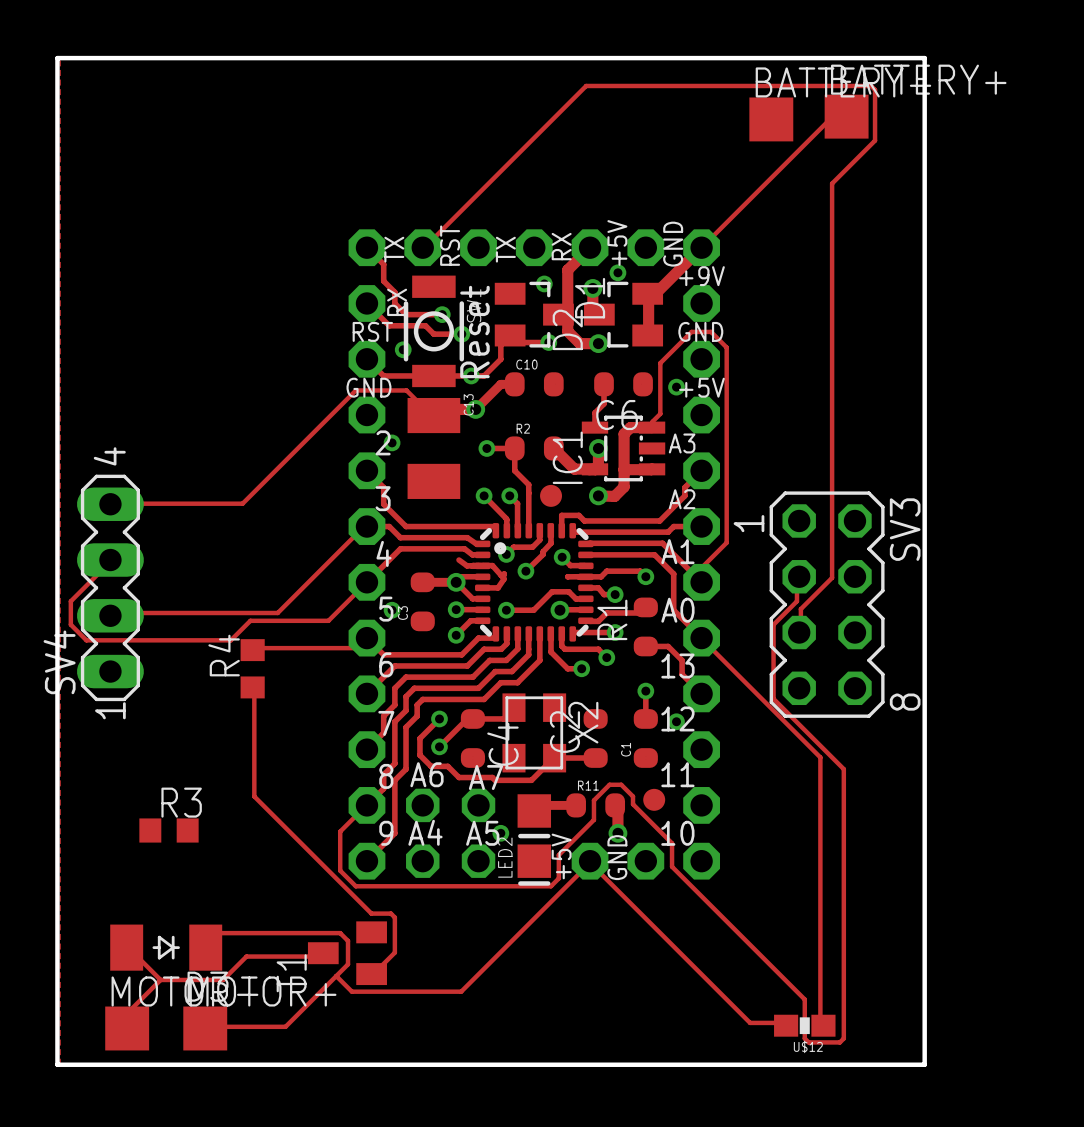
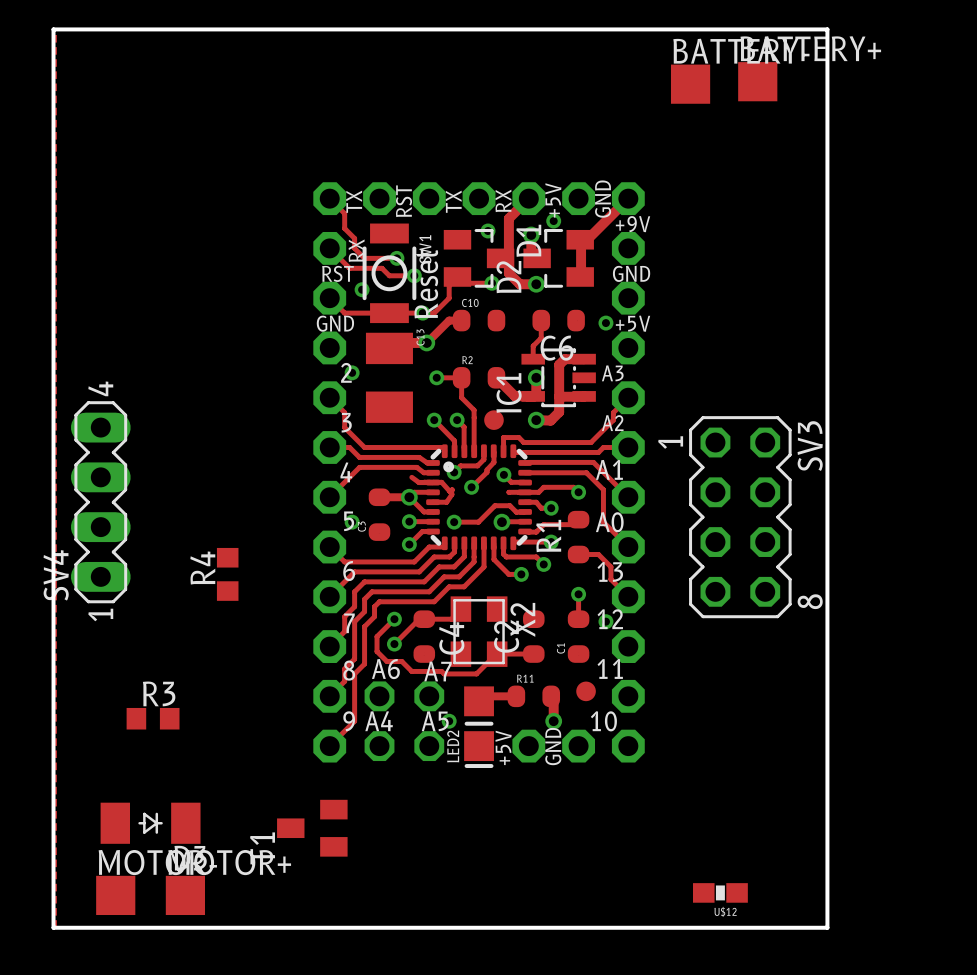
track: (846, 116) (832, 117) (701, 247) -> none
track: (422, 247) (586, 85) (871, 85) (875, 89) (875, 140) (832, 183) (832, 577) (800, 609) (800, 632) (799, 632) -> none
track: (433, 415) (406, 390) (355, 390) (242, 503) (110, 504) -> none
track: (652, 427) (652, 421) (660, 413) (660, 363) (691, 331) (711, 331) (726, 347) (726, 542) (695, 573) (701, 582) -> none
track: (366, 526) (363, 527) (277, 613) (113, 613) (110, 615) -> none
track: (110, 560) (70, 601) (70, 624) (86, 640) (230, 640) (250, 620) (328, 620) (366, 582) -> none
track: (799, 576) (796, 577) (796, 601) (773, 624) (773, 698) (843, 769) (843, 1038) (839, 1042) (808, 1042) (804, 1038) (804, 999) (672, 866) (672, 843) (633, 804) (633, 796) (621, 784) (609, 784) (593, 800) (593, 819) (558, 855) (558, 878) (551, 886) (355, 886) (340, 870) (340, 831) (366, 805) -> none
track: (366, 638) (355, 648) (254, 648) (252, 650) -> none
track: (701, 638) (820, 757) (820, 1022) (823, 1025) -> none
track: (252, 687) (254, 691) (254, 796) (371, 913) (390, 913) (394, 917) (394, 952) (371, 974) -> none
track: (590, 862) (750, 1022) (785, 1022) (786, 1025) -> none
track: (590, 862) (461, 991) (351, 991) (336, 976) -> none
track: (126, 947) (160, 979) -> none
track: (205, 947) (219, 933) (340, 933) (348, 940) (348, 964) (285, 1026) (207, 1026) (205, 1028) -> none
track: (323, 953) (320, 956) (246, 956) (223, 979) (160, 979) -> none
track: (160, 979) (129, 1011) (129, 1026) (127, 1028) -> none

